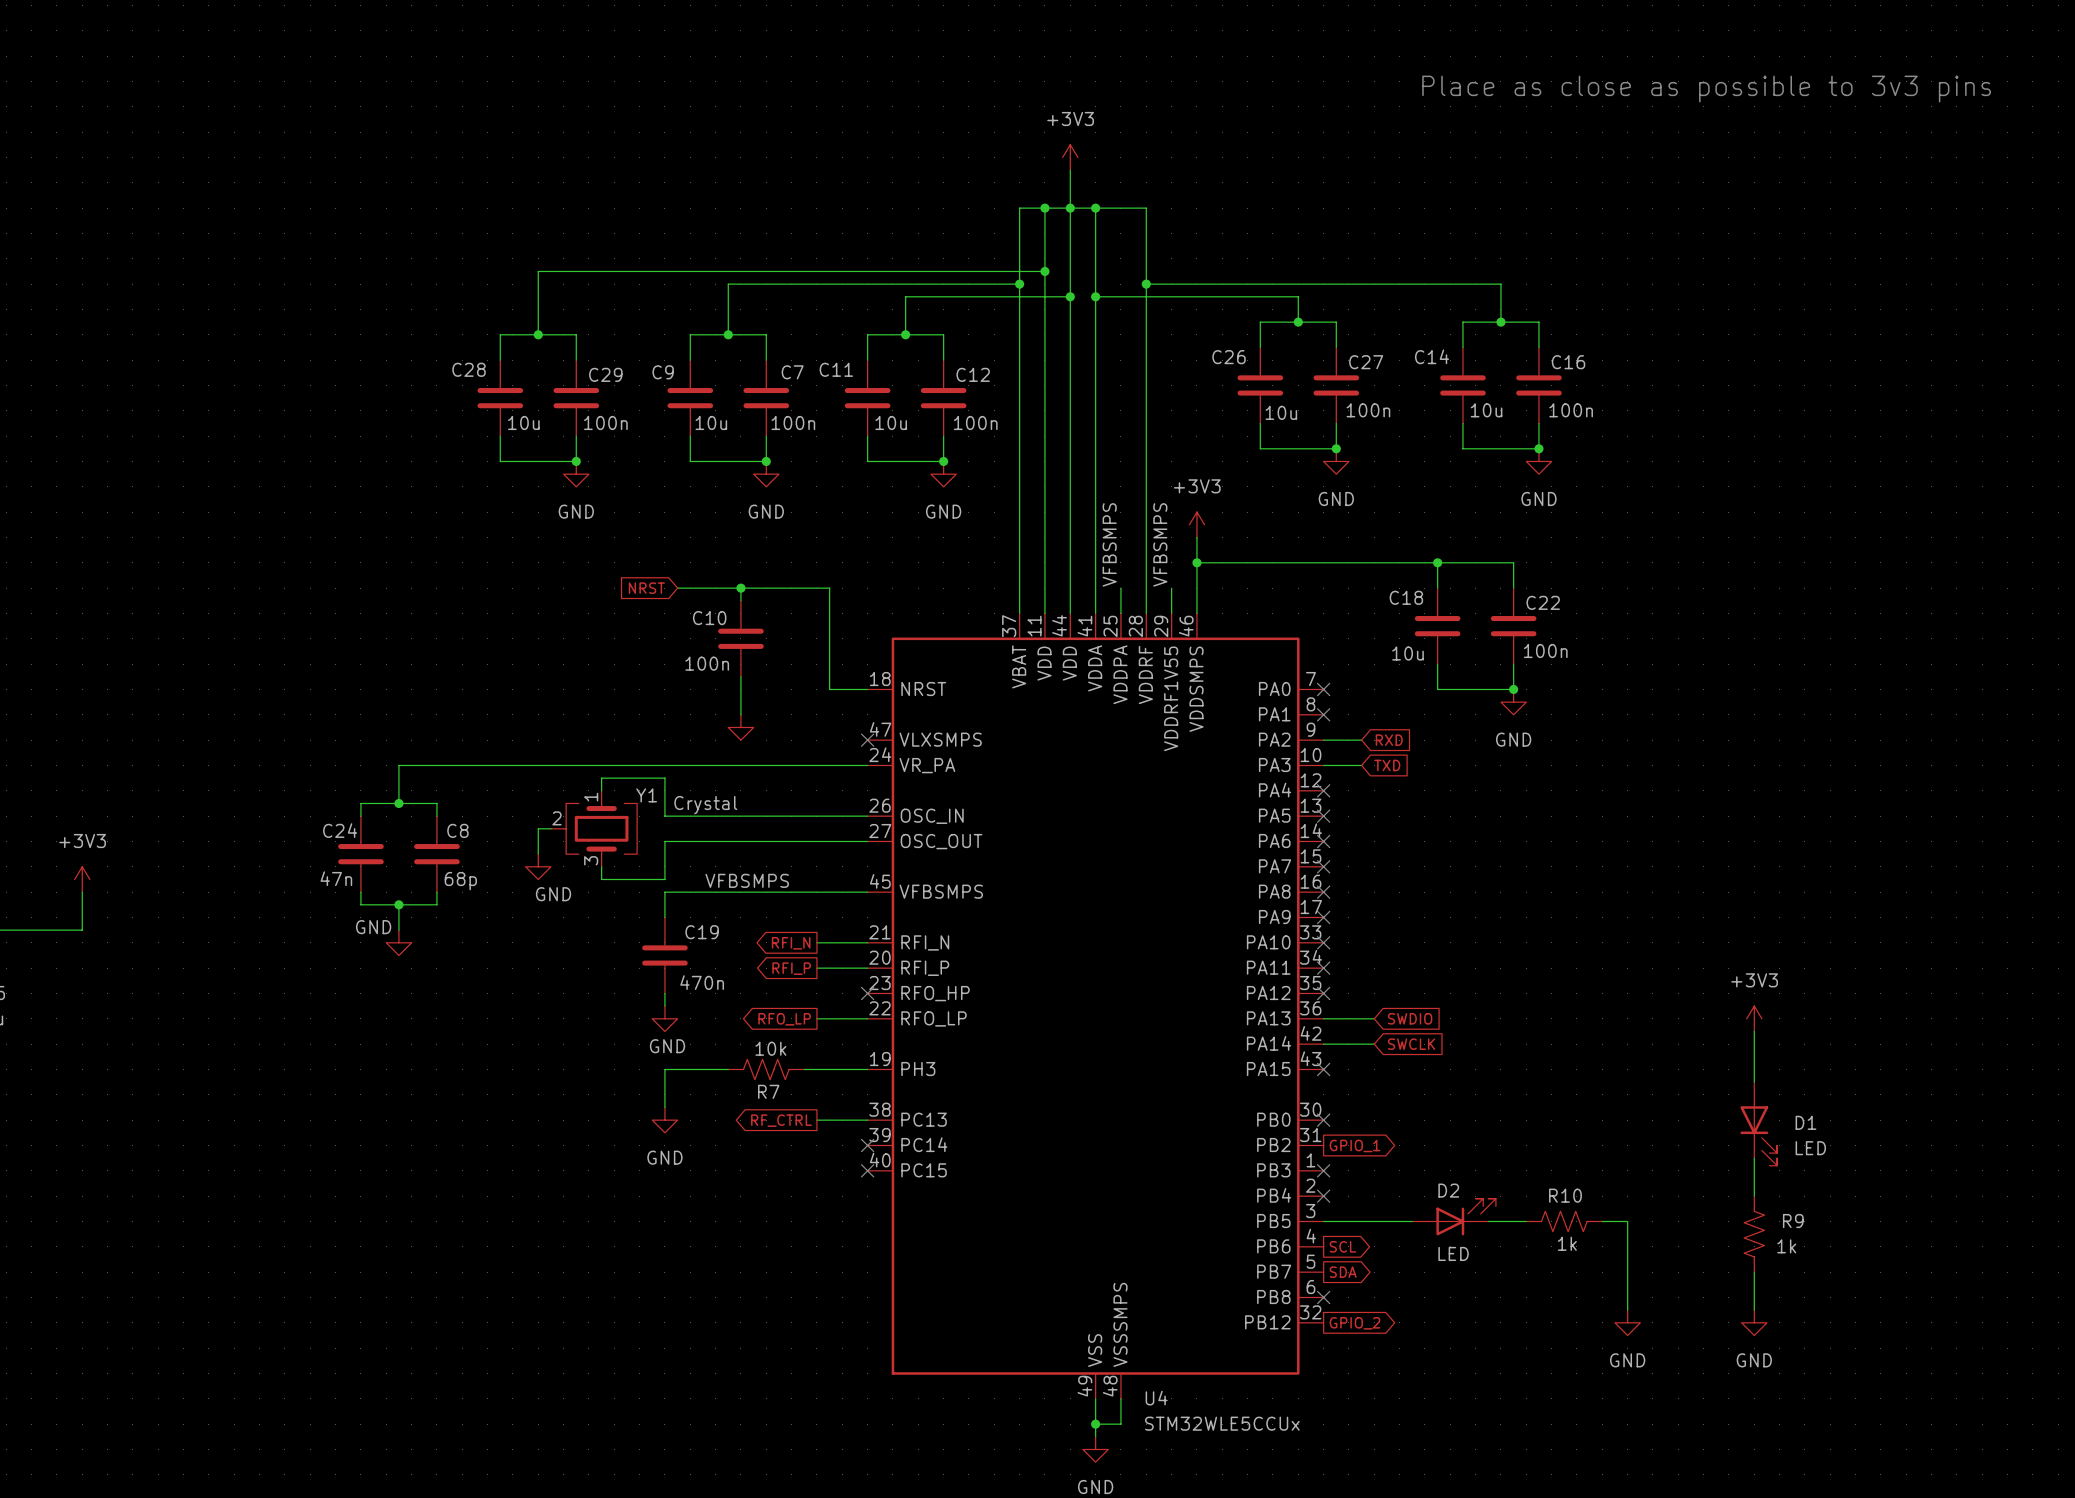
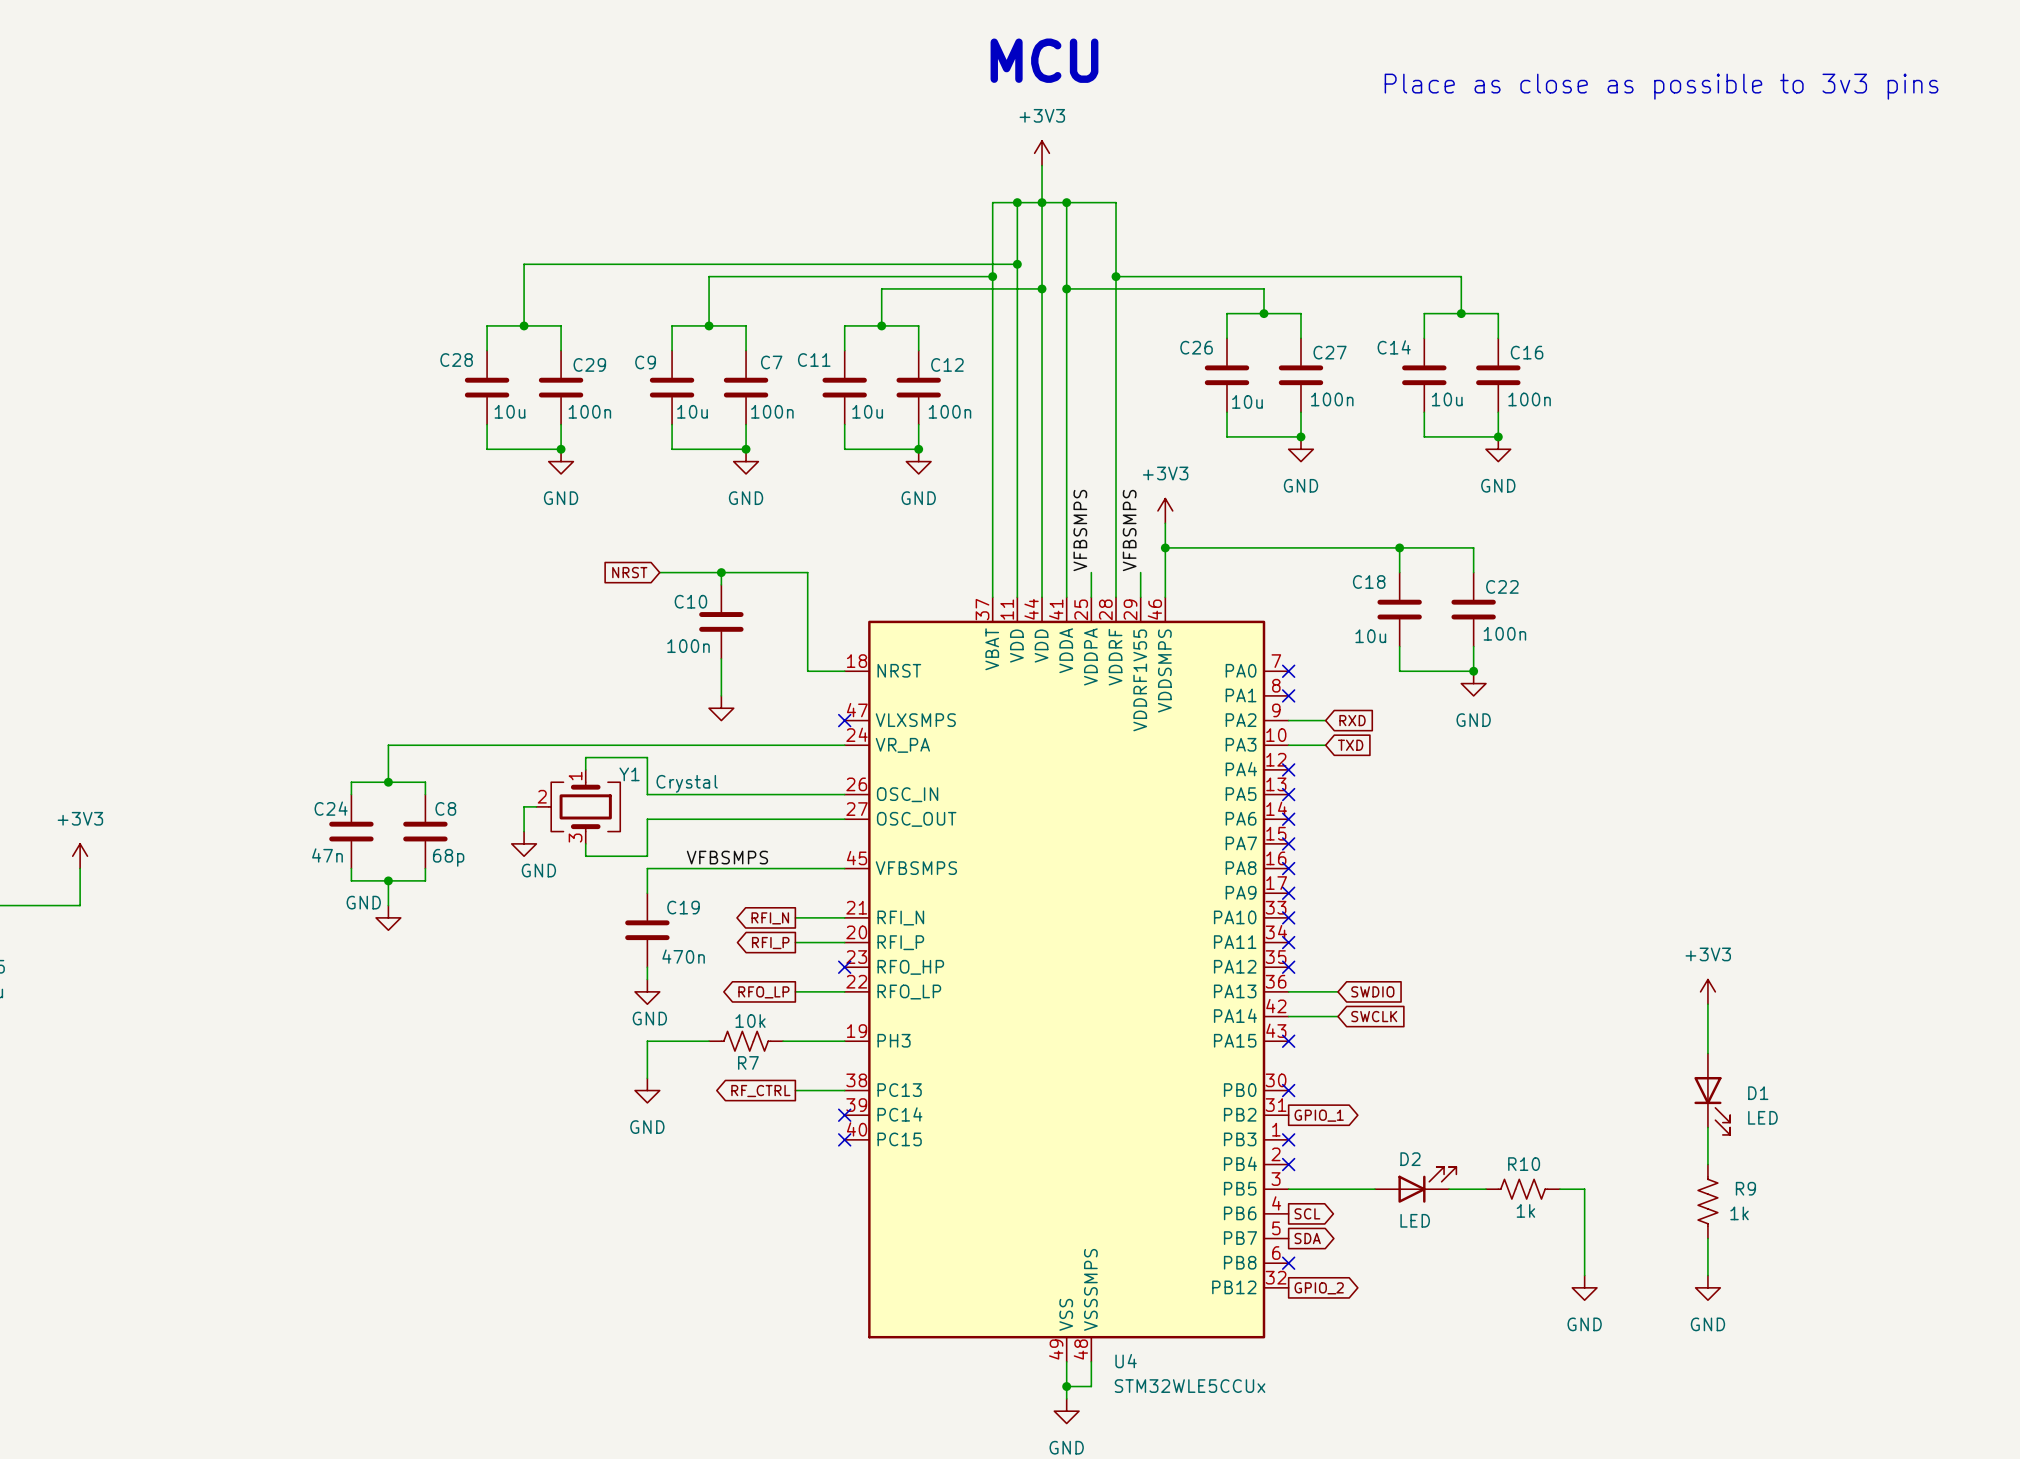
text: none -> MCU (1044, 60)

